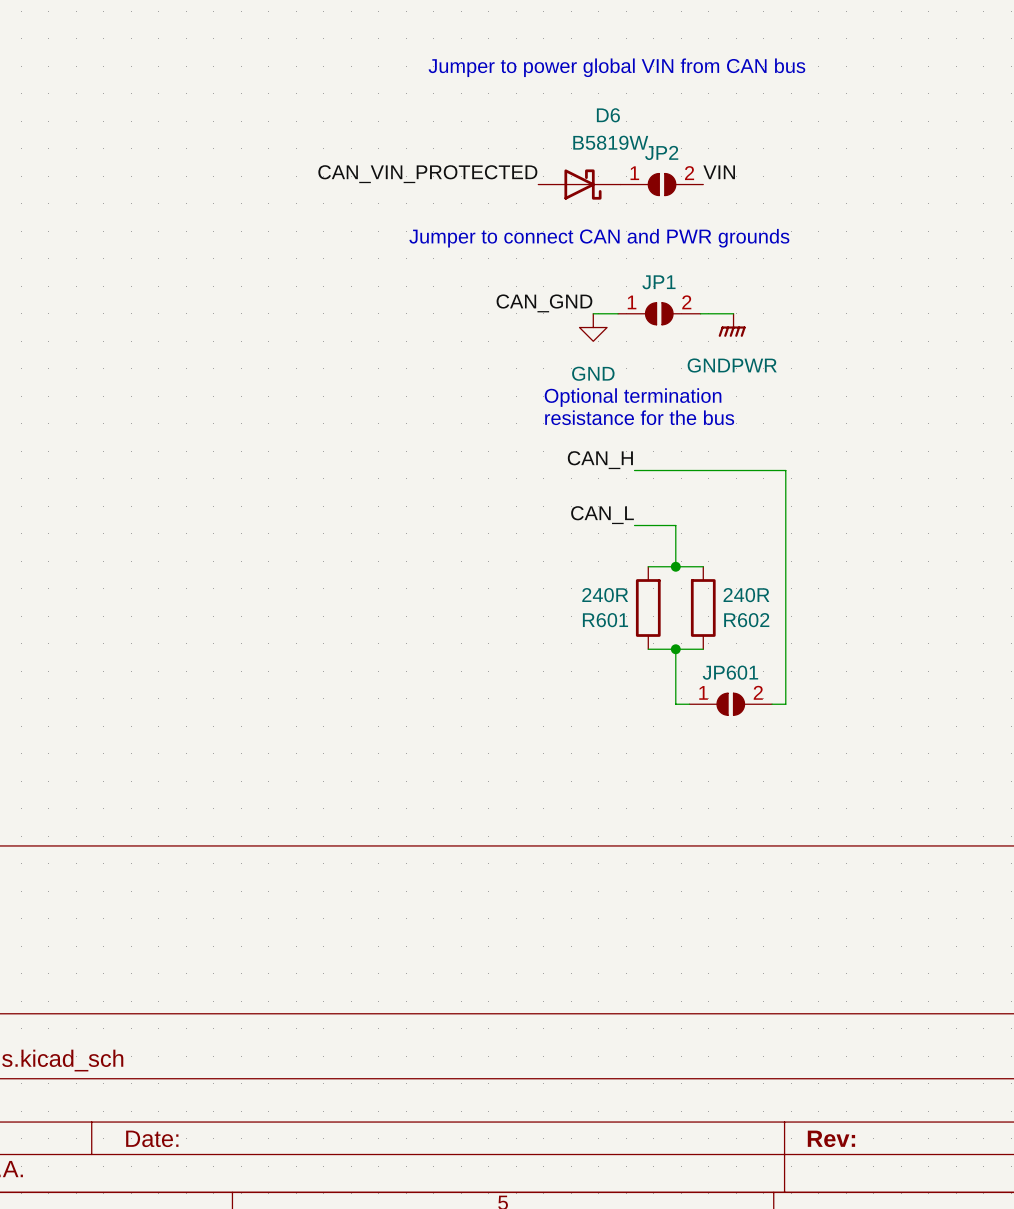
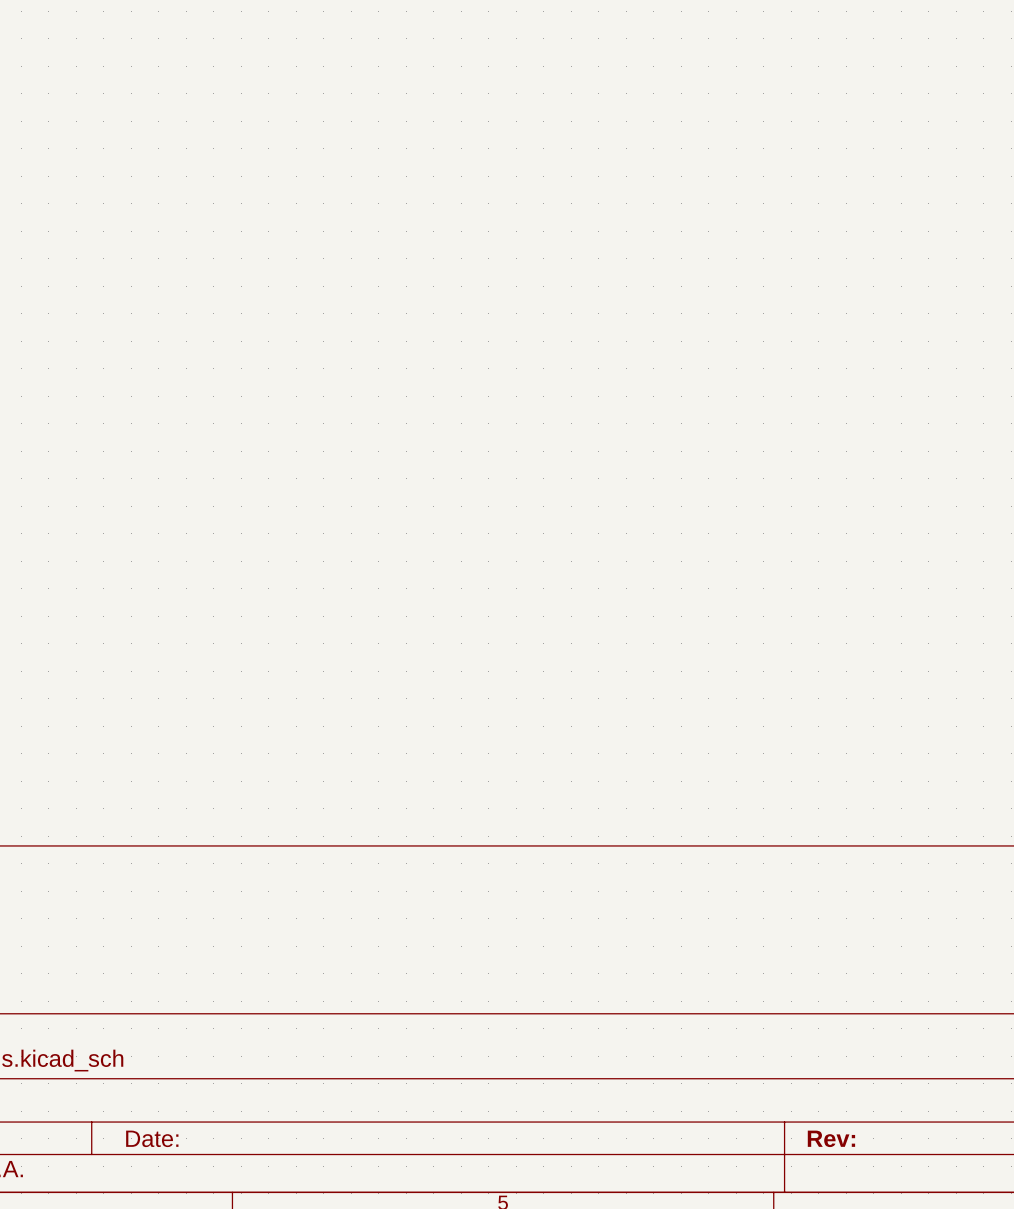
text: Jumper to power global VIN from CAN bus (616, 67) -> none
label: VIN (719, 172) -> none
label: CAN_VIN_PROTECTED (427, 174) -> none
D6: B5819W (579, 184) -> none
JP2: (662, 184) -> none
text: Jumper to connect CAN and PWR grounds (599, 238) -> none
label: CAN_GND (544, 303) -> none
wire: (593, 313) (618, 313) -> none
JP1: (659, 313) -> none
wire: (700, 313) (733, 313) -> none
power symbol: GNDPWR (732, 325) -> none
power symbol: GND (593, 327) -> none
text: Optional termination (633, 397) -> none
text: resistance for the bus (639, 417) -> none
label: CAN_H (600, 460) -> none
wire: (634, 470) (785, 470) (785, 704) (772, 704) -> none
label: CAN_L (602, 515) -> none
wire: (634, 525) (675, 525) (675, 566) -> none
wire: (648, 566) (703, 566) -> none
junction: (675, 566) -> none
R601: 240R (648, 608) -> none
R602: 240R (703, 608) -> none
wire: (648, 649) (703, 649) -> none
wire: (675, 649) (675, 704) (689, 704) -> none
junction: (675, 649) -> none
JP601: (730, 704) -> none

